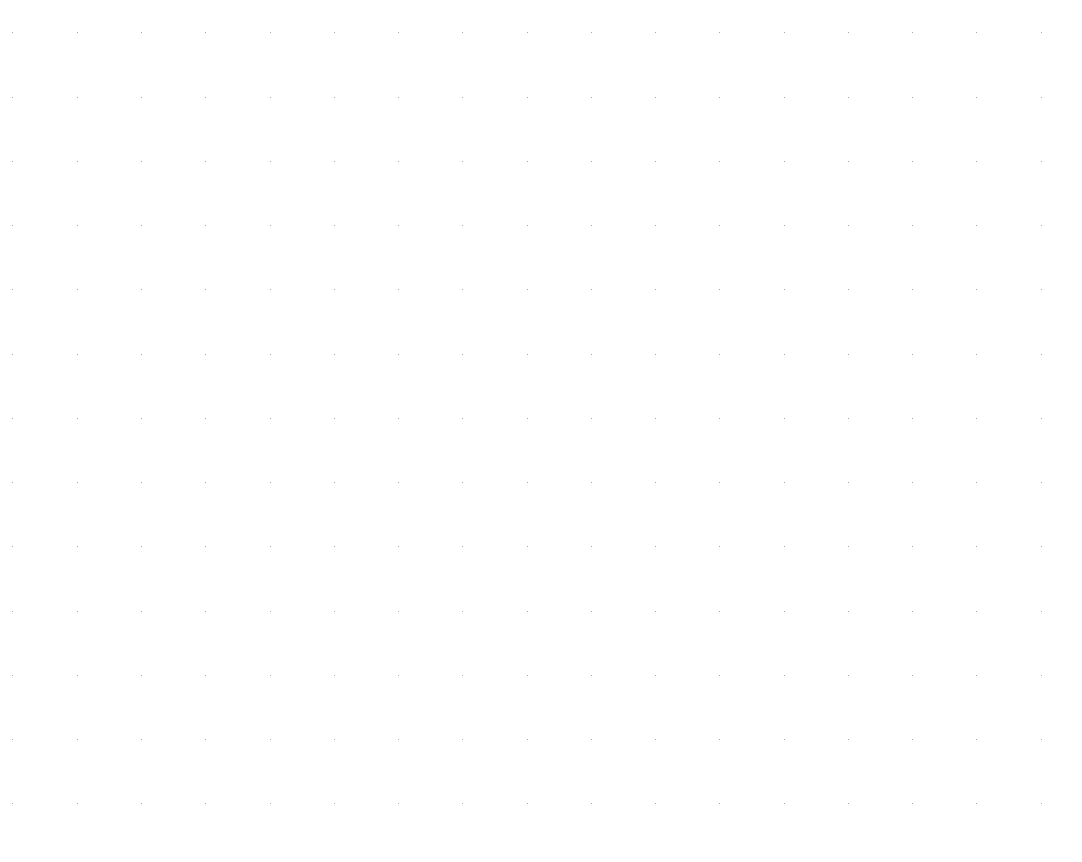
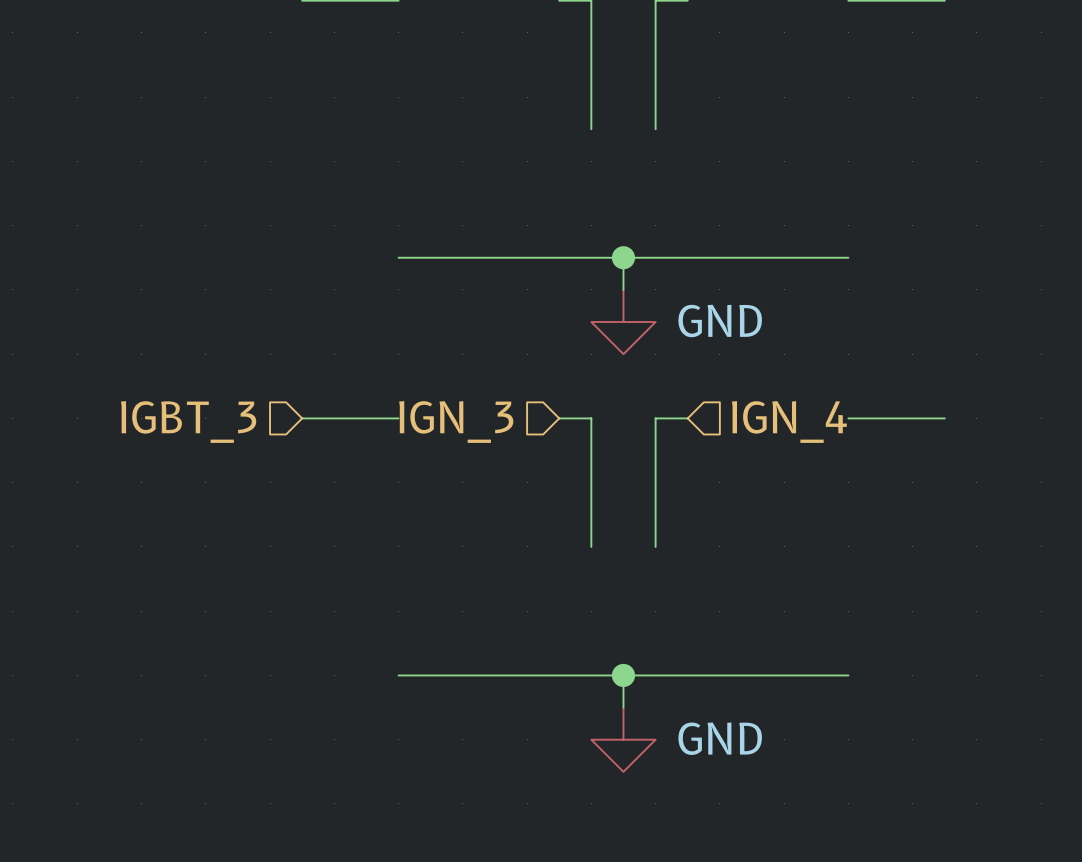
wire: none -> (302, 0) (398, 0)
wire: none -> (559, 0) (591, 0) (591, 129)
wire: none -> (687, 0) (655, 0) (655, 129)
wire: none -> (848, 0) (944, 0)
wire: none -> (398, 257) (848, 257)
wire: none -> (623, 257) (623, 289)
junction: none -> (623, 257)
power symbol: none -> GND (623, 322)
wire: none -> (302, 418) (398, 418)
wire: none -> (559, 418) (591, 418) (591, 546)
wire: none -> (687, 418) (655, 418) (655, 546)
wire: none -> (848, 418) (944, 418)
hierarchical label: none -> IGBT_3 (188, 422)
hierarchical label: none -> IGN_3 (456, 422)
hierarchical label: none -> IGN_4 (789, 422)
wire: none -> (398, 675) (848, 675)
wire: none -> (623, 675) (623, 707)
junction: none -> (623, 675)
power symbol: none -> GND (623, 739)

